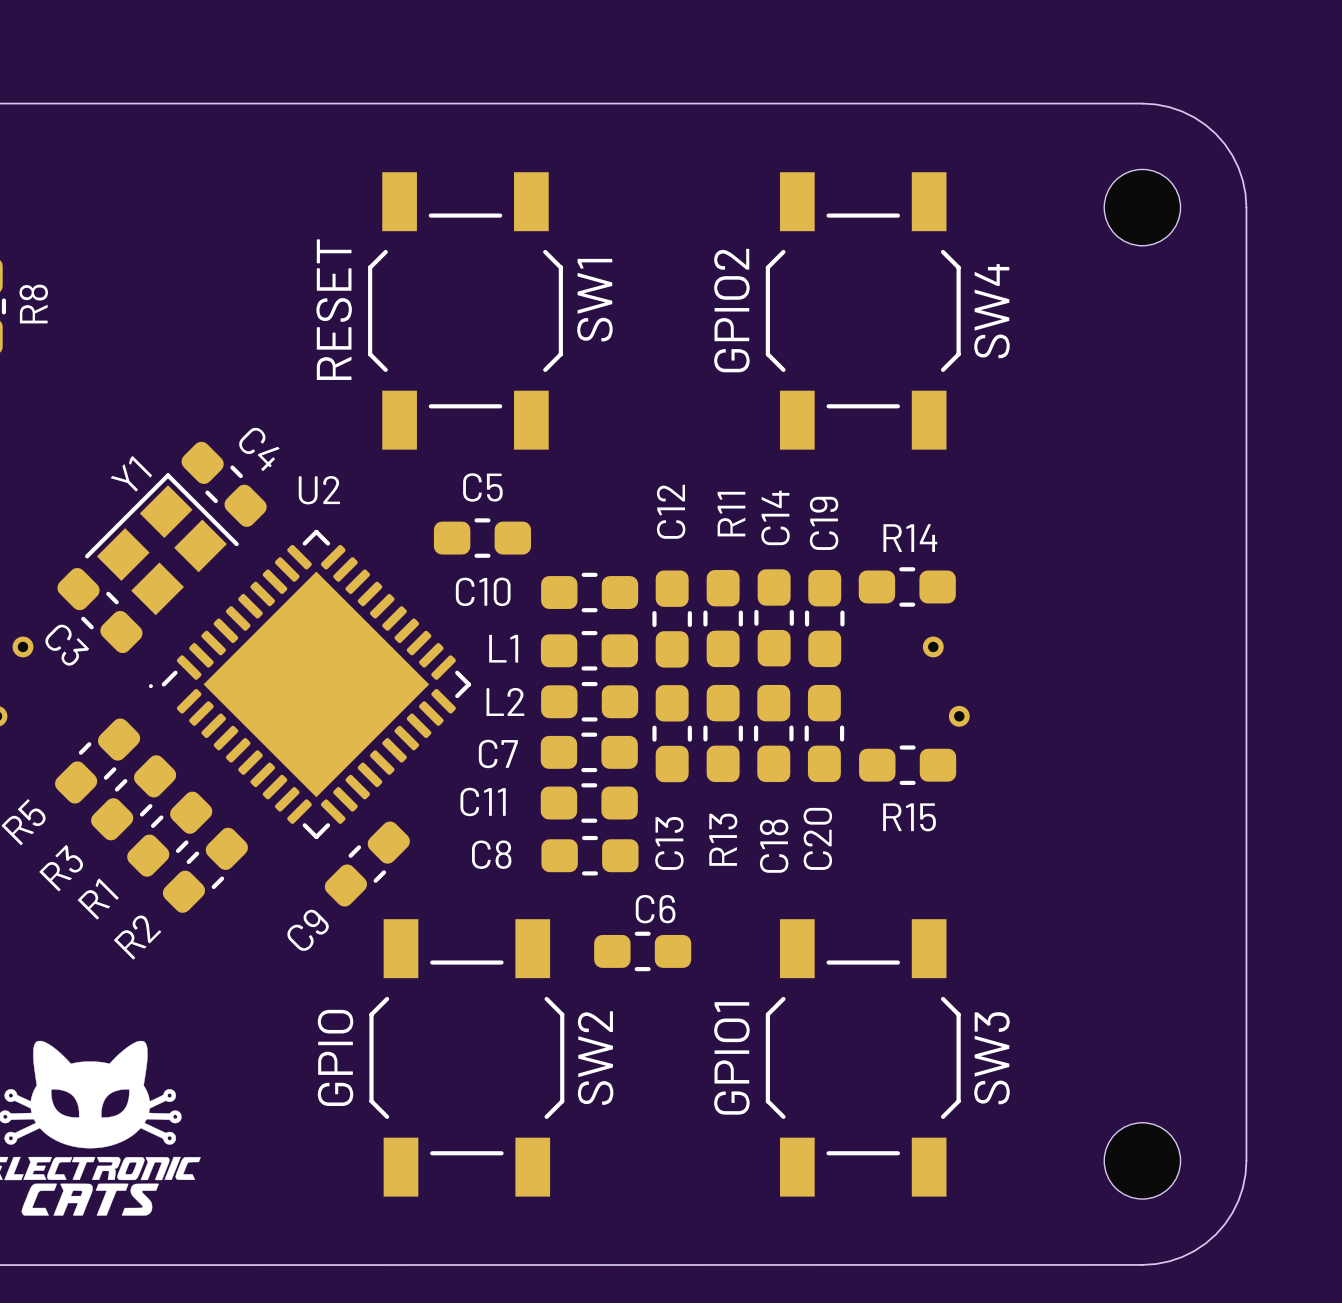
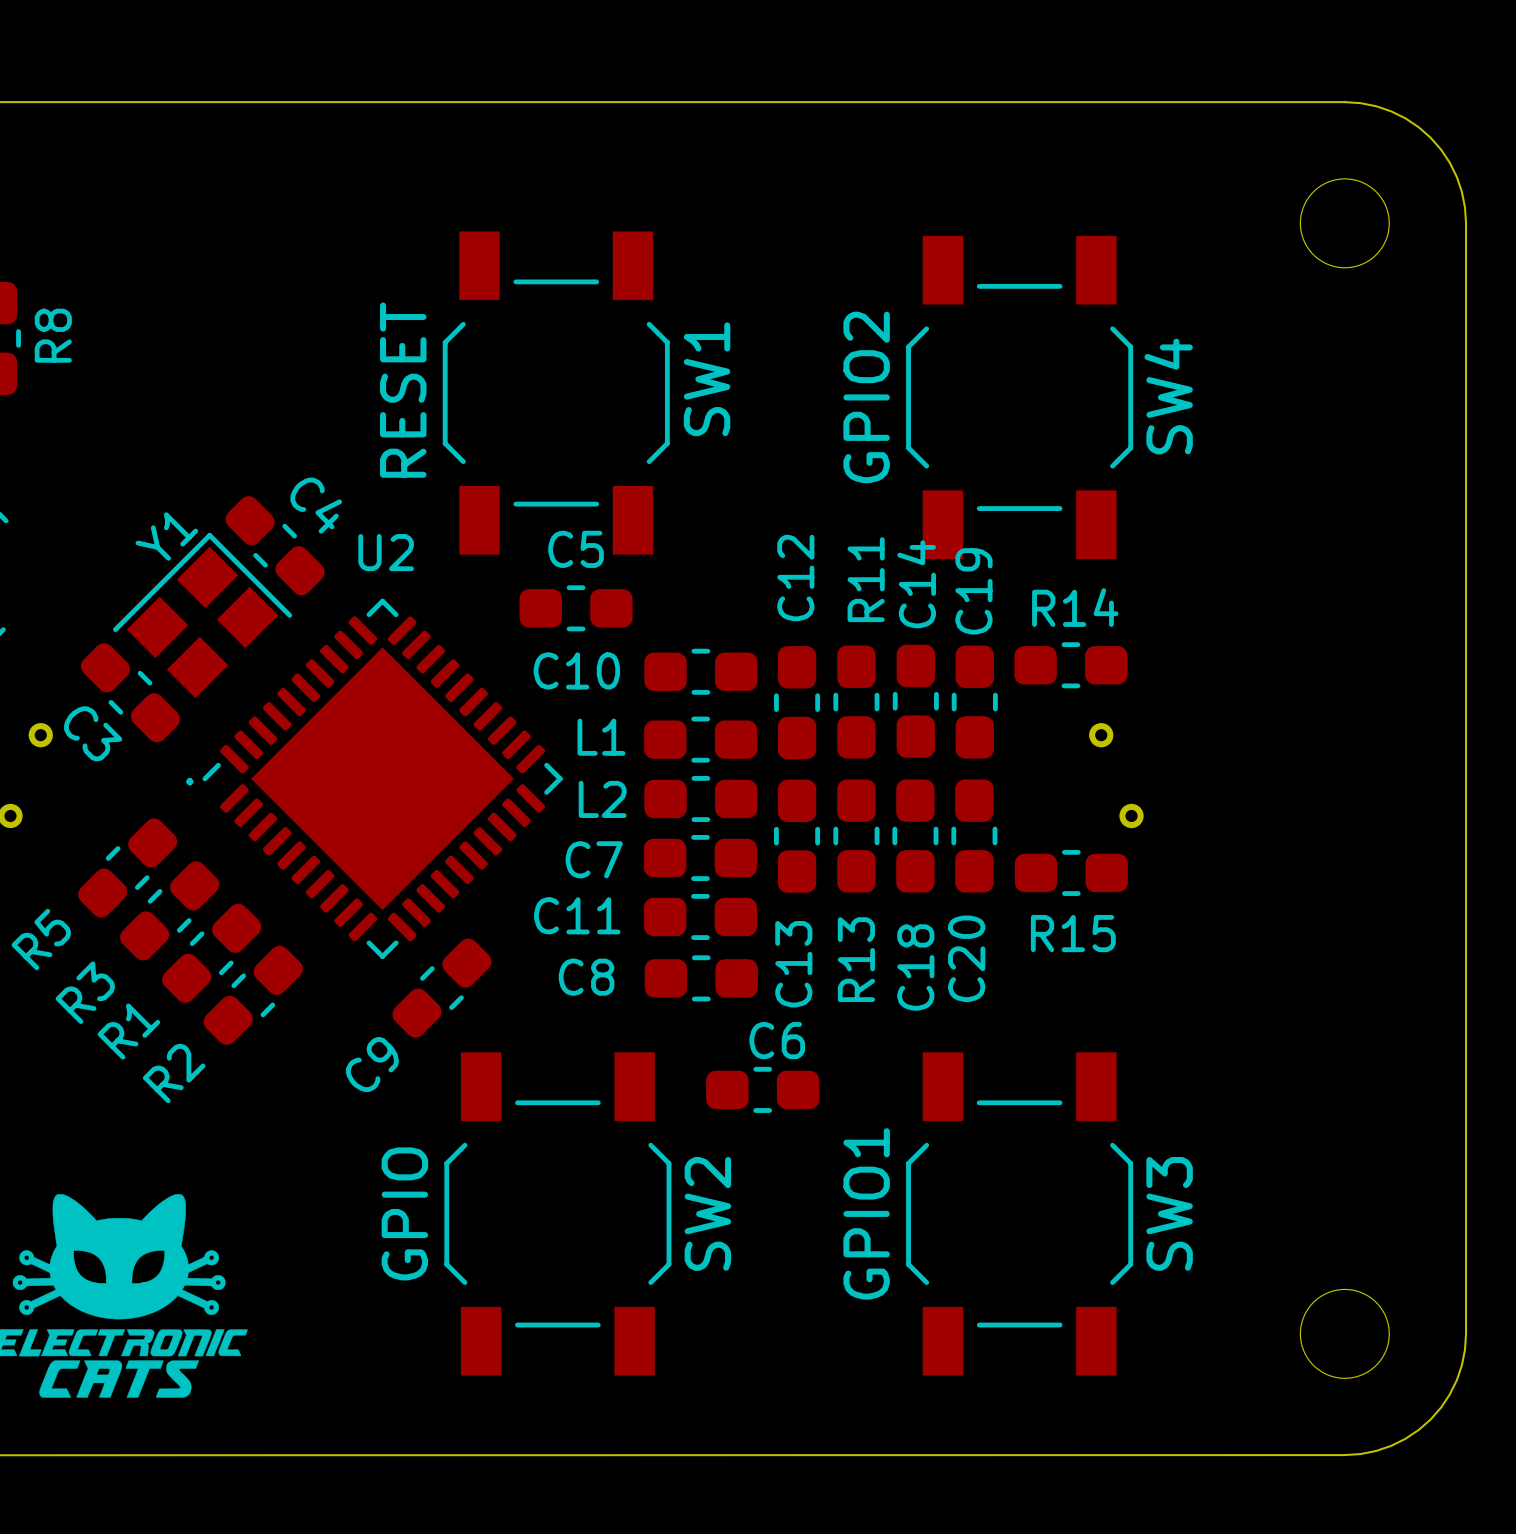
SW1 position: (465, 310) -> (556, 393)
SW4 position: (863, 310) -> (1019, 397)

